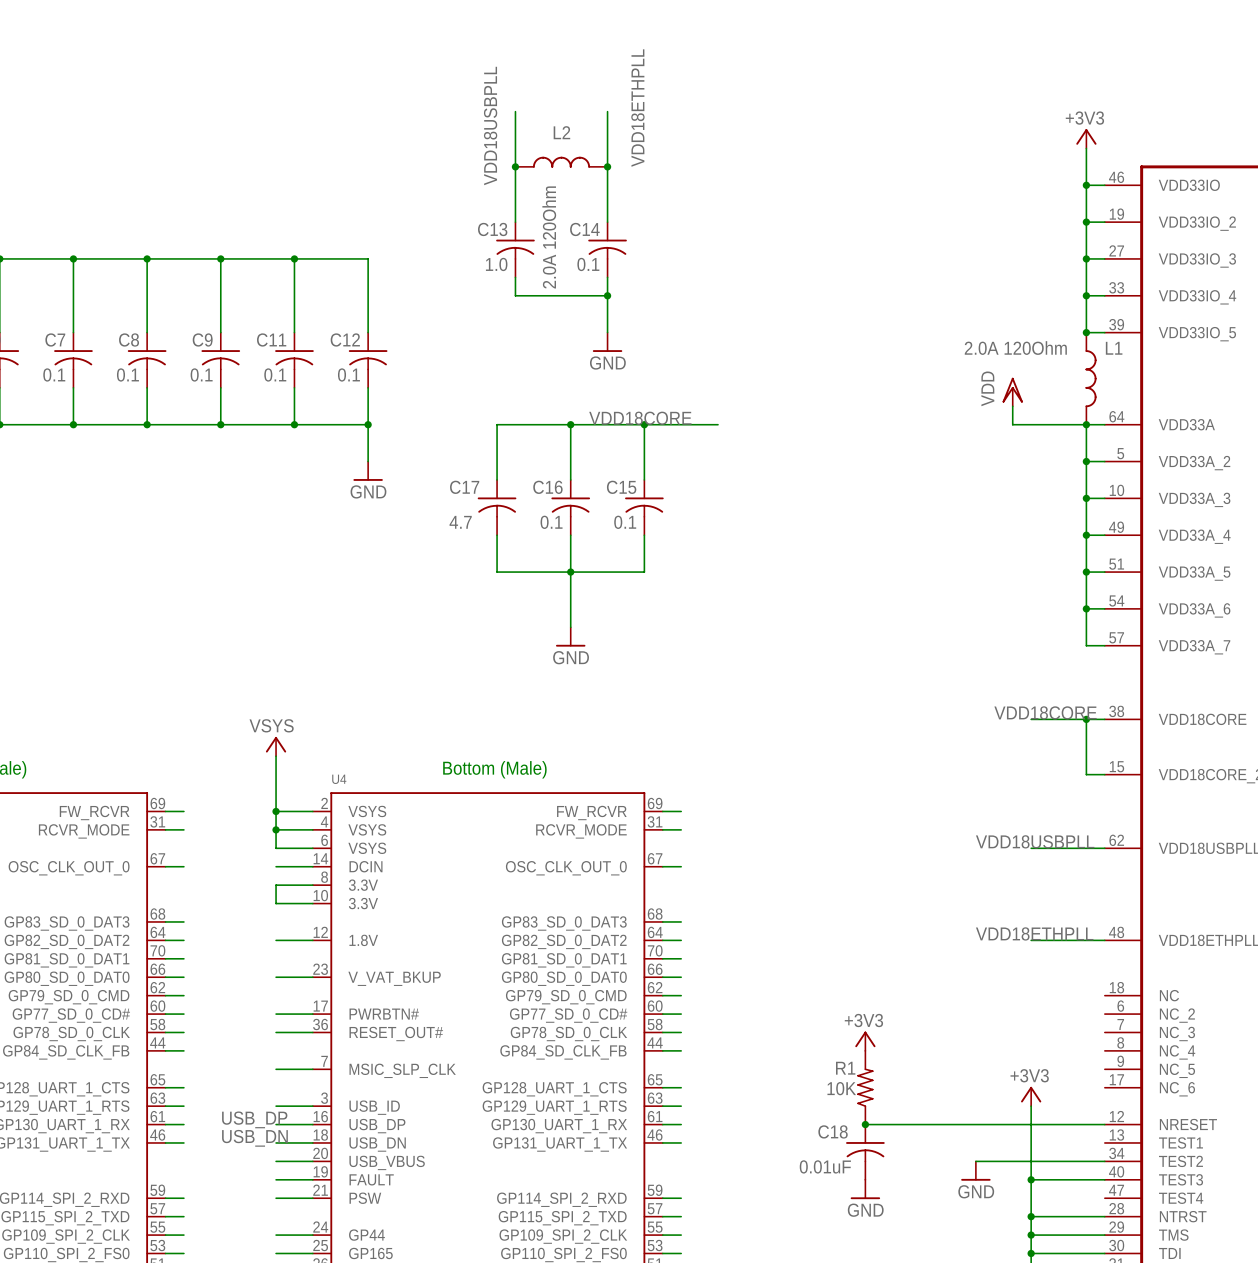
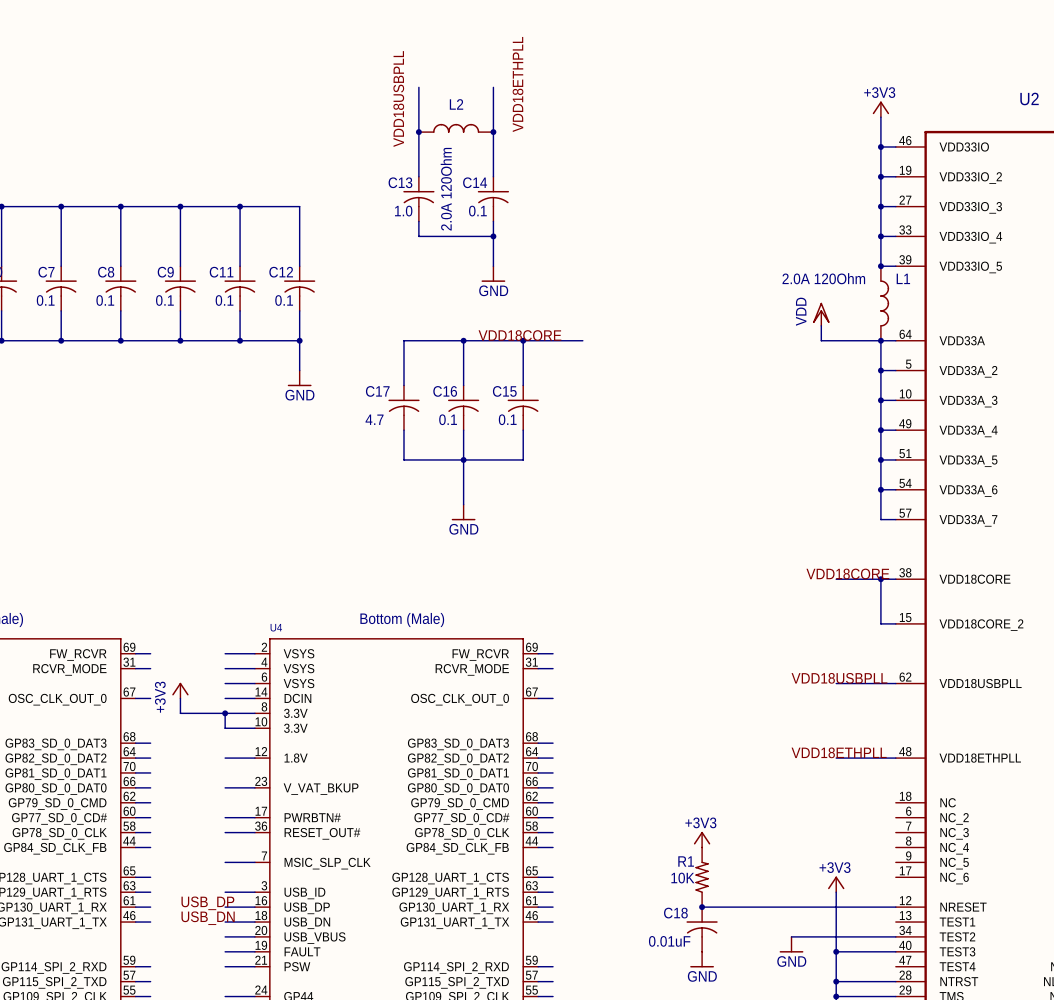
power symbol: VSYS (276, 746) -> none
wire: (276, 756) (276, 848) -> none
junction: (276, 811) -> none
junction: (276, 829) -> none
power symbol: none -> +3V3 (180, 690)
wire: none -> (180, 698) (180, 713) (225, 713)
junction: none -> (225, 713)

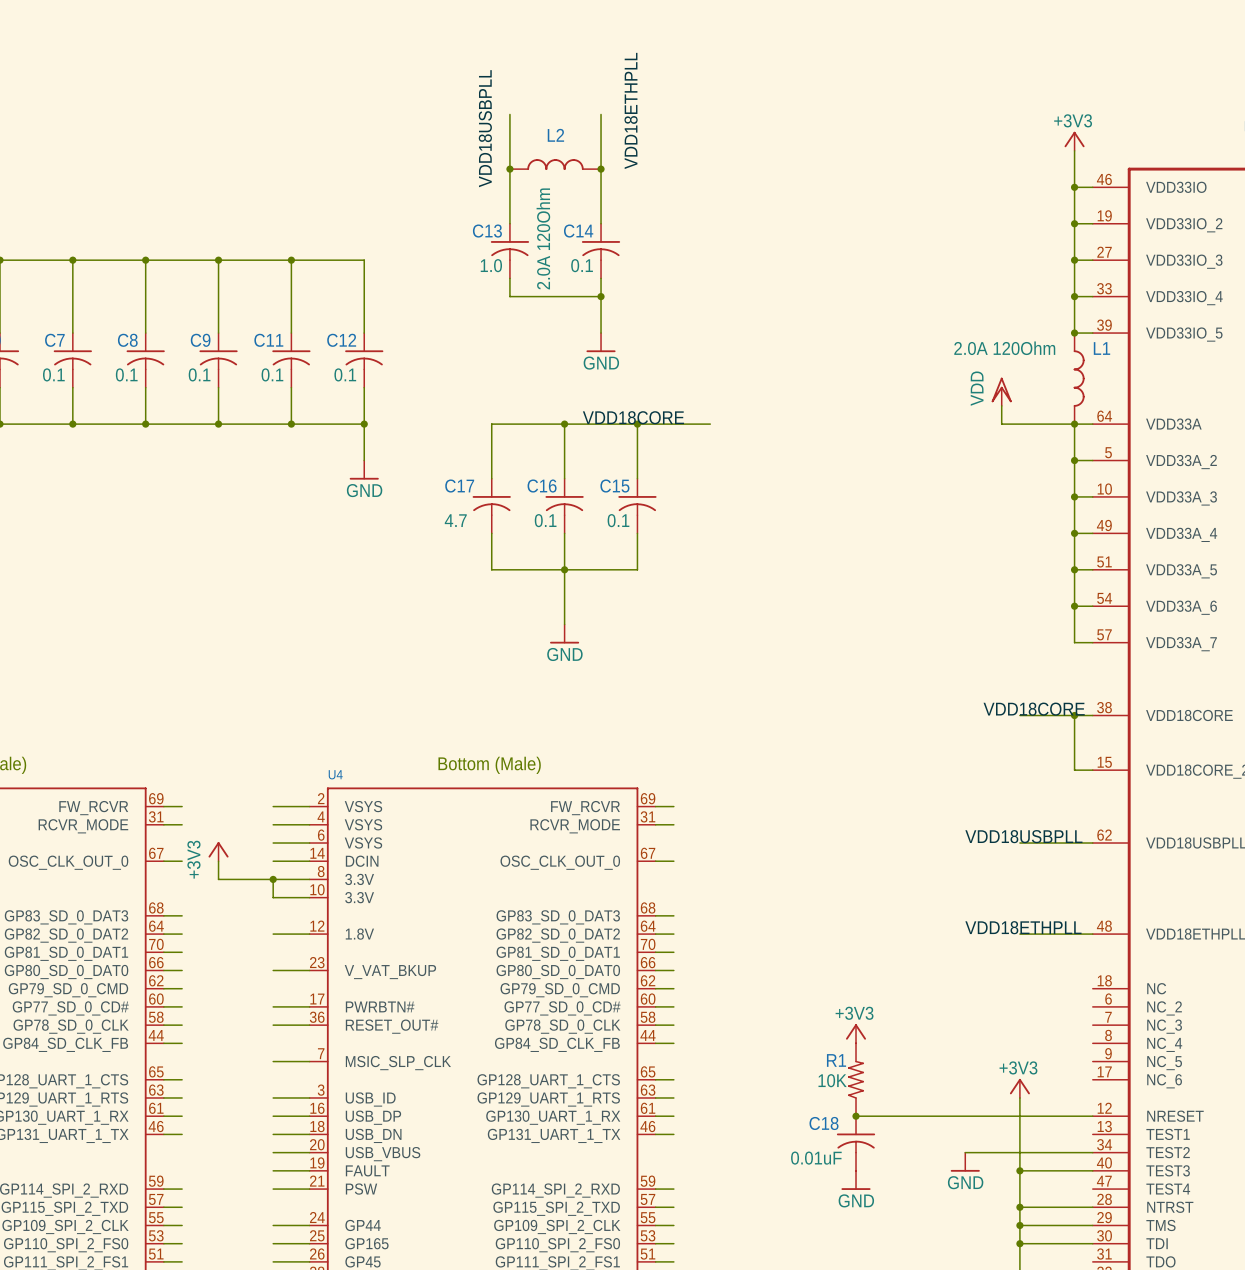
label: USB_DP (207, 903) -> none
label: USB_DN (208, 918) -> none

